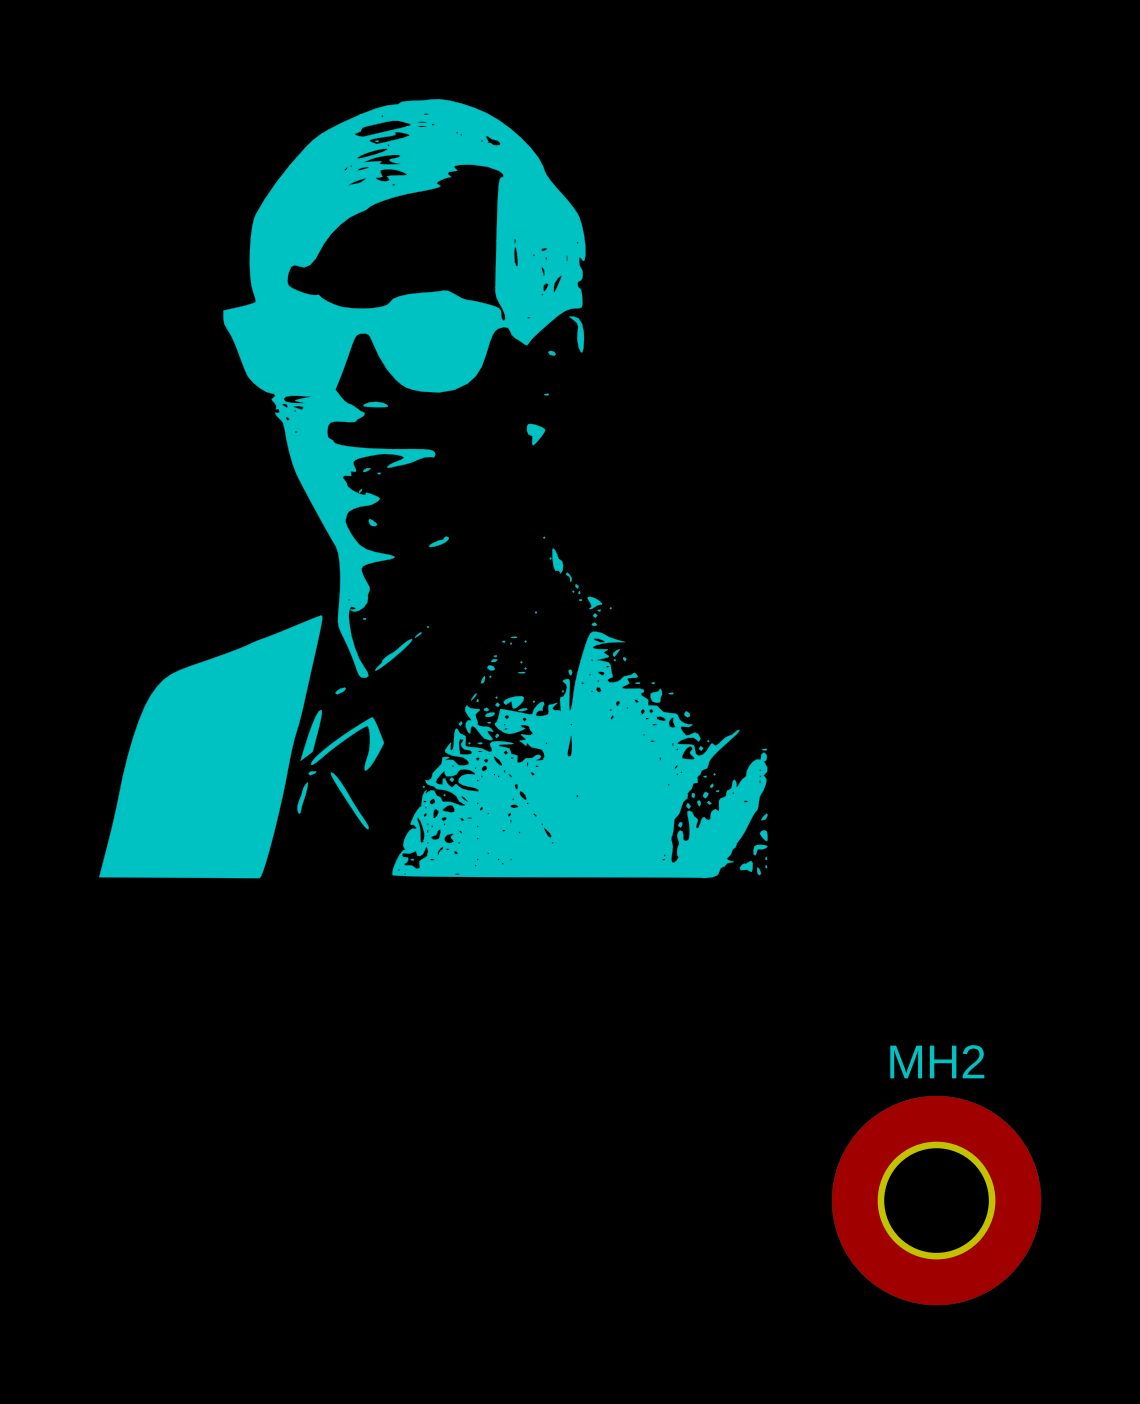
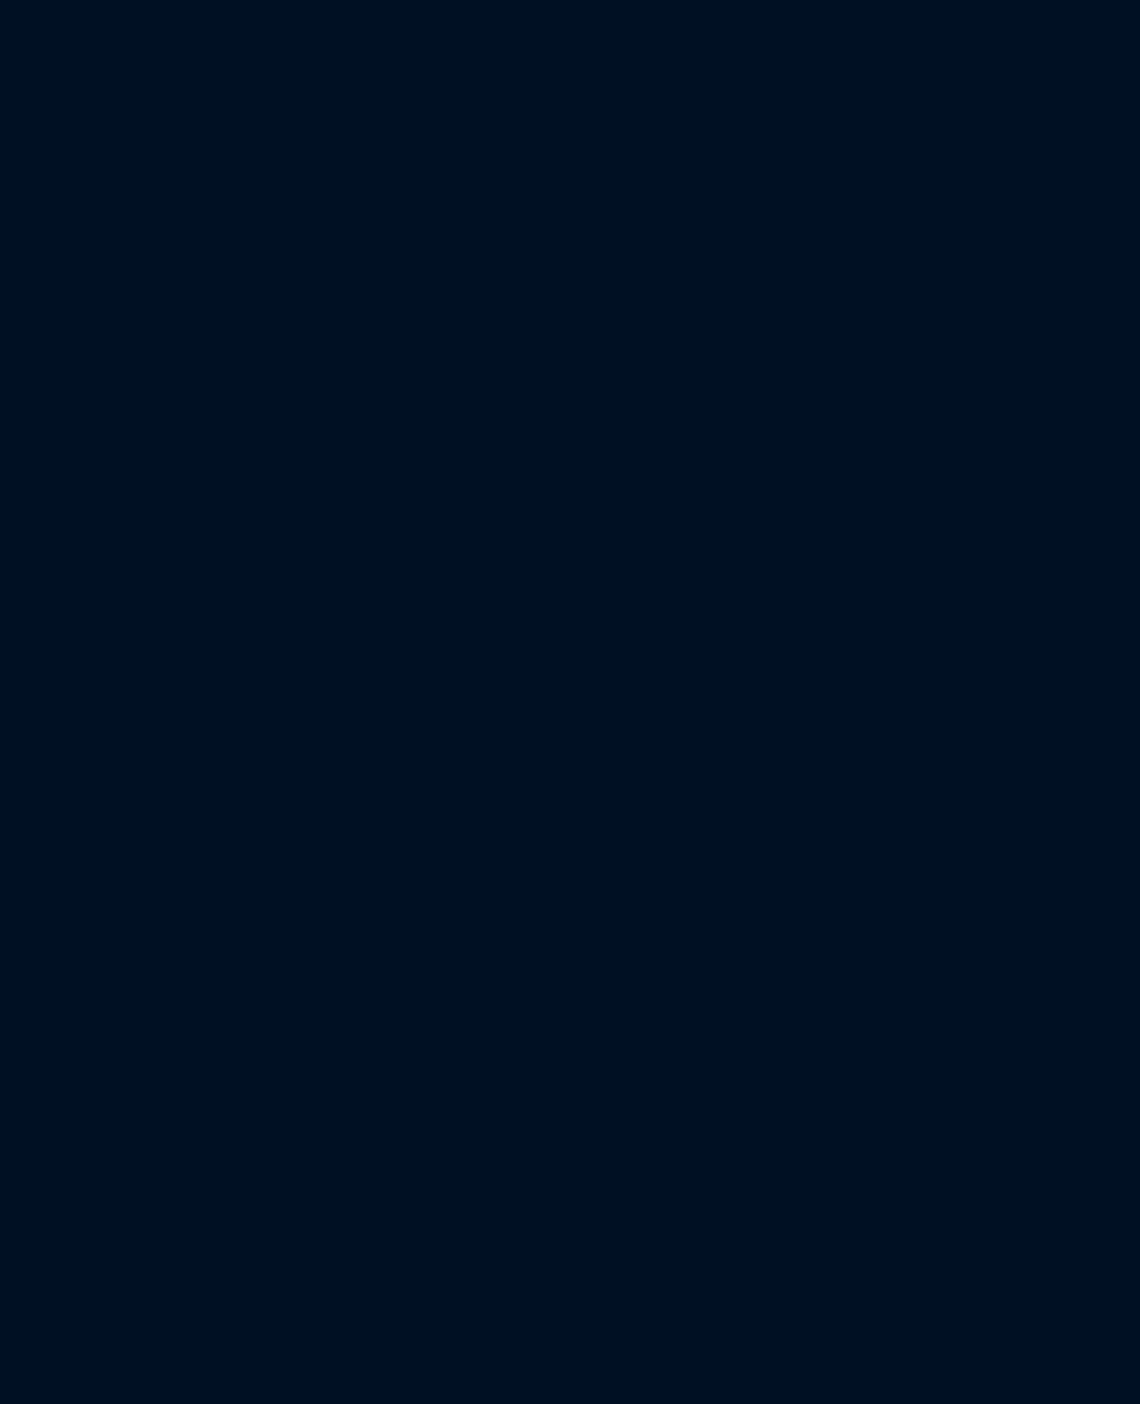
drawing: [99, 99, 768, 879] -> none
MH2: (936, 1200) -> none

